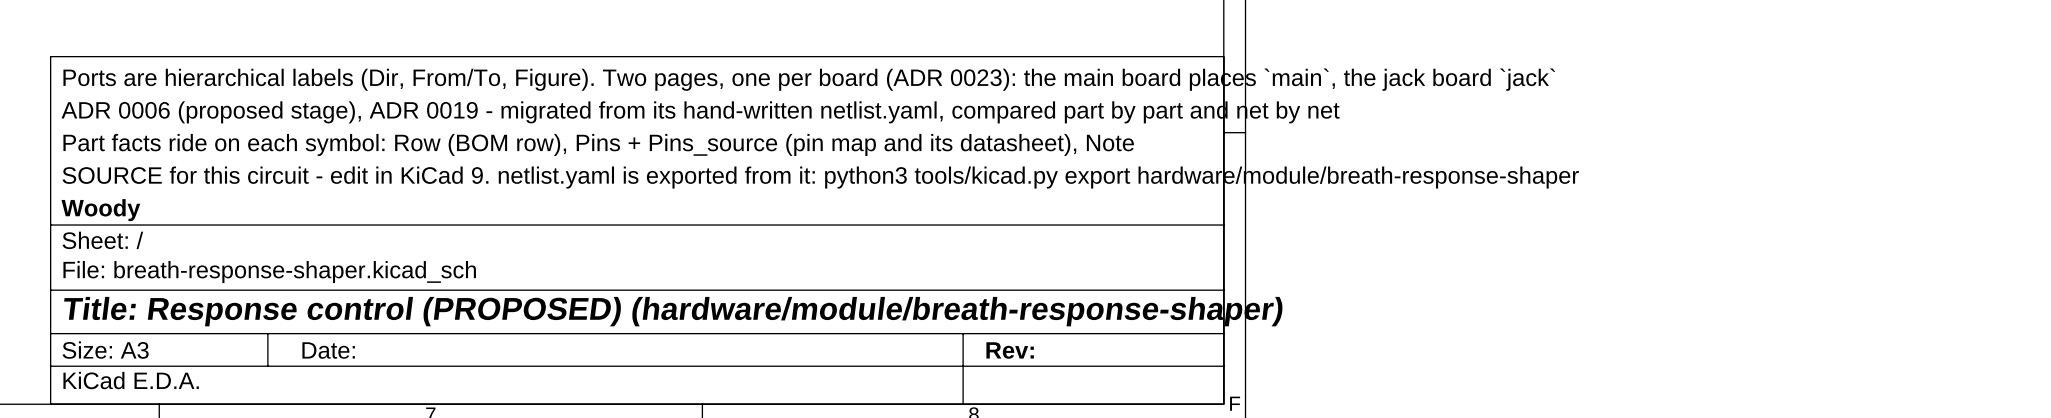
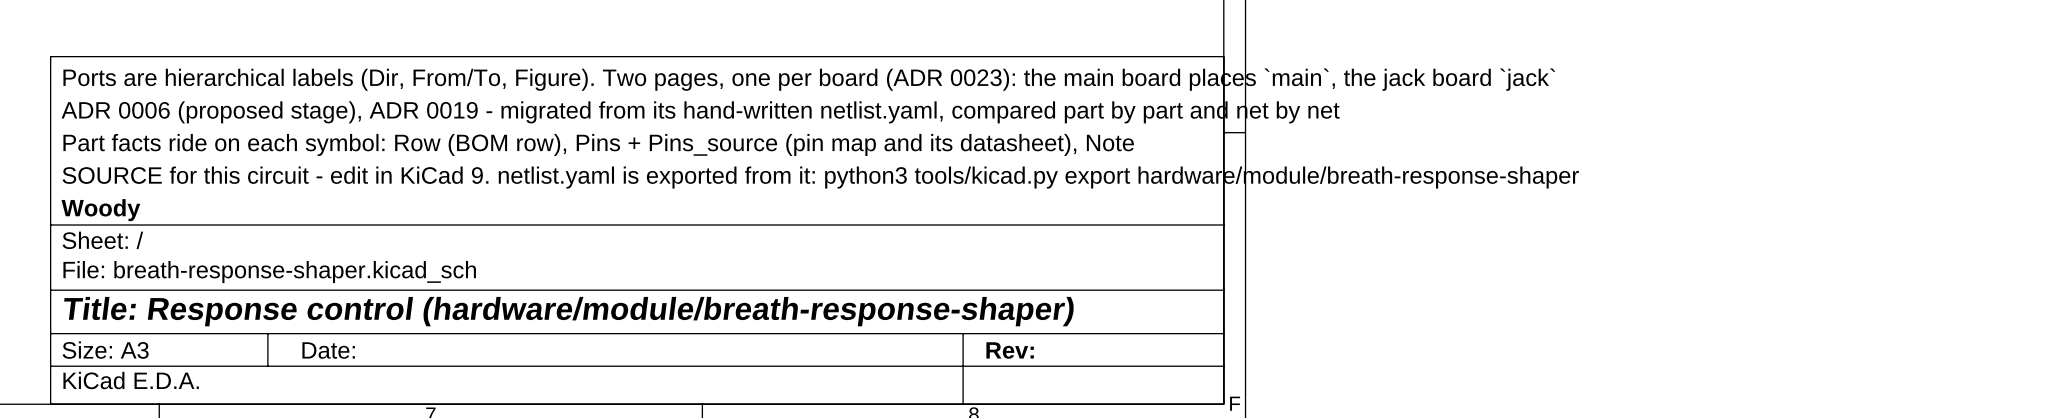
title block: Title: Response control (PROPOSED) (hardware/module/breath-response-shaper) (673, 311) -> Title: Response control (hardware/module/breath-response-shaper) (569, 311)

